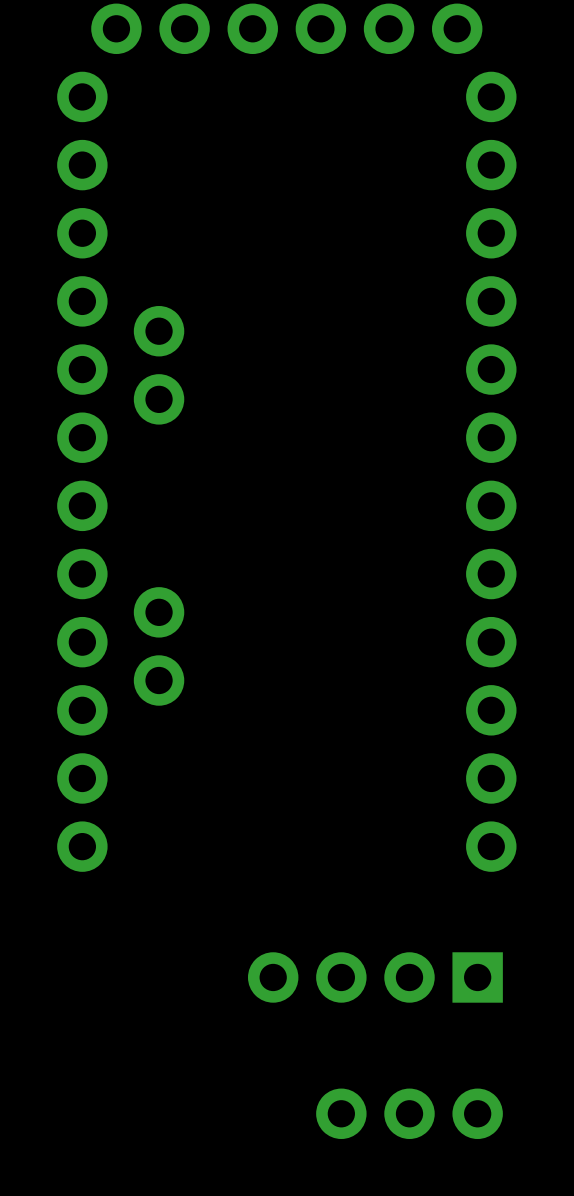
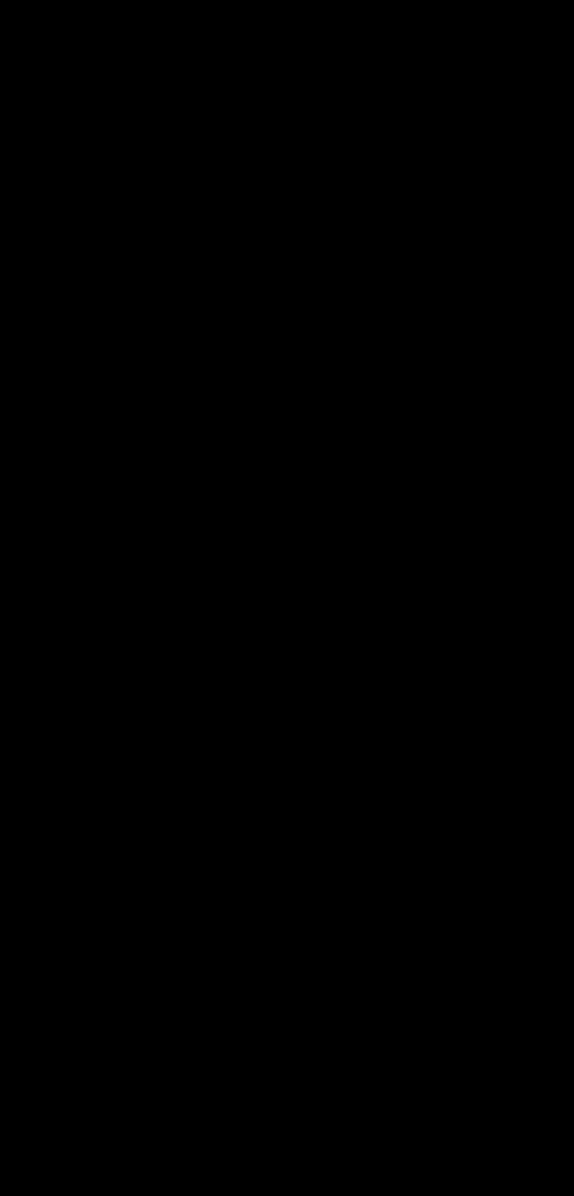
part: (286, 437) -> none
part: (375, 977) -> none
part: (409, 1113) -> none

